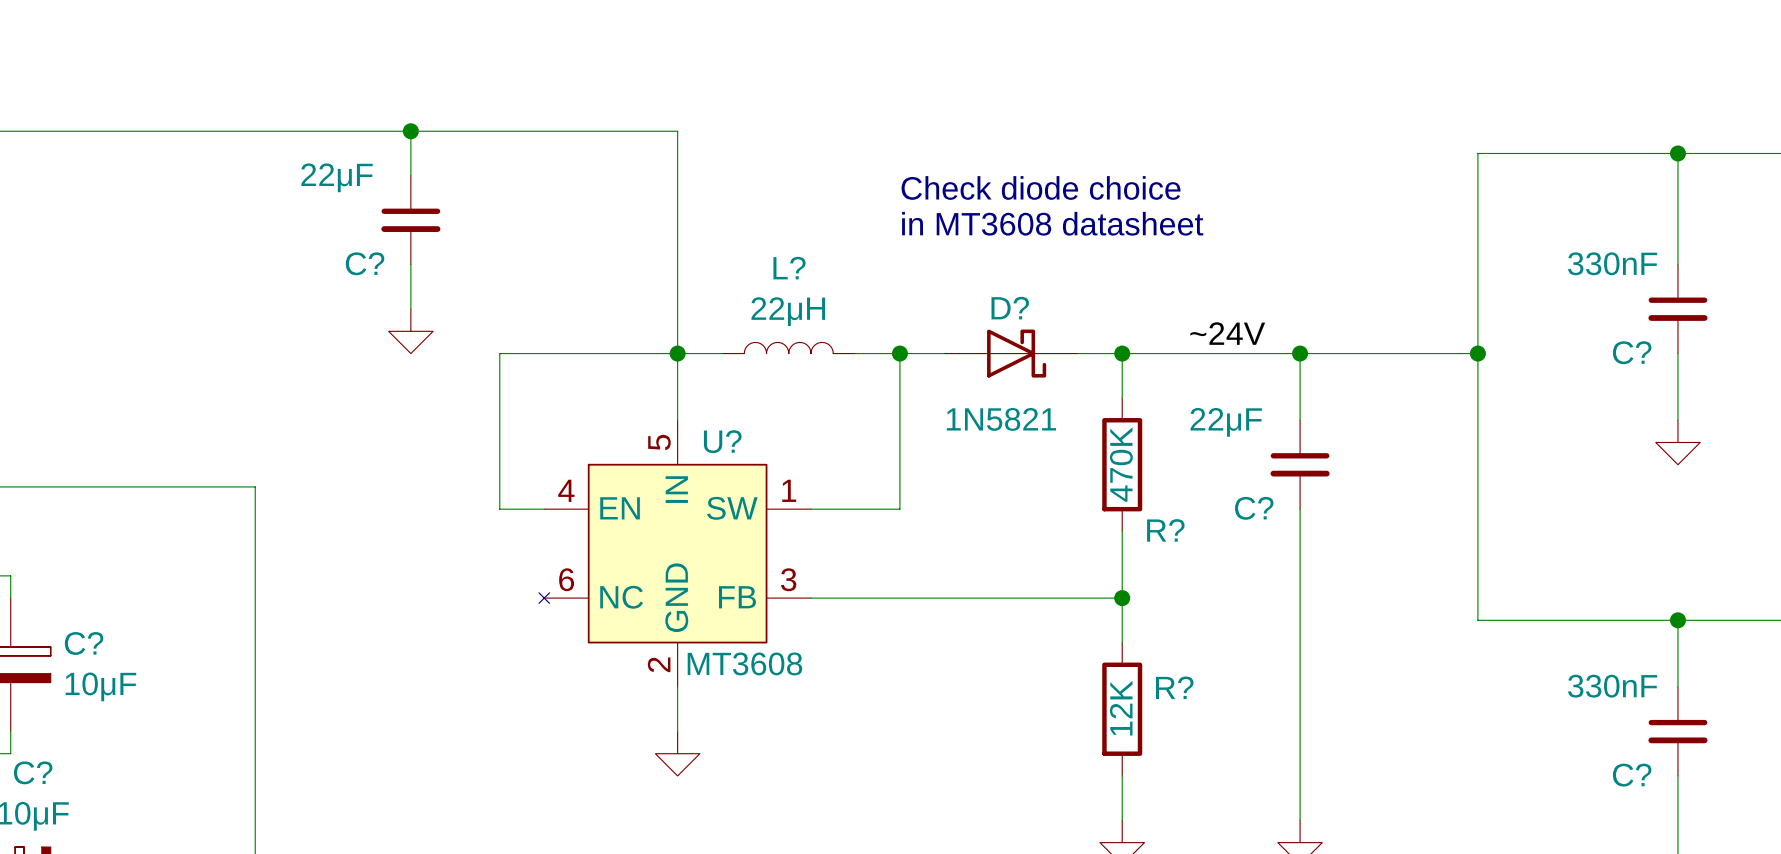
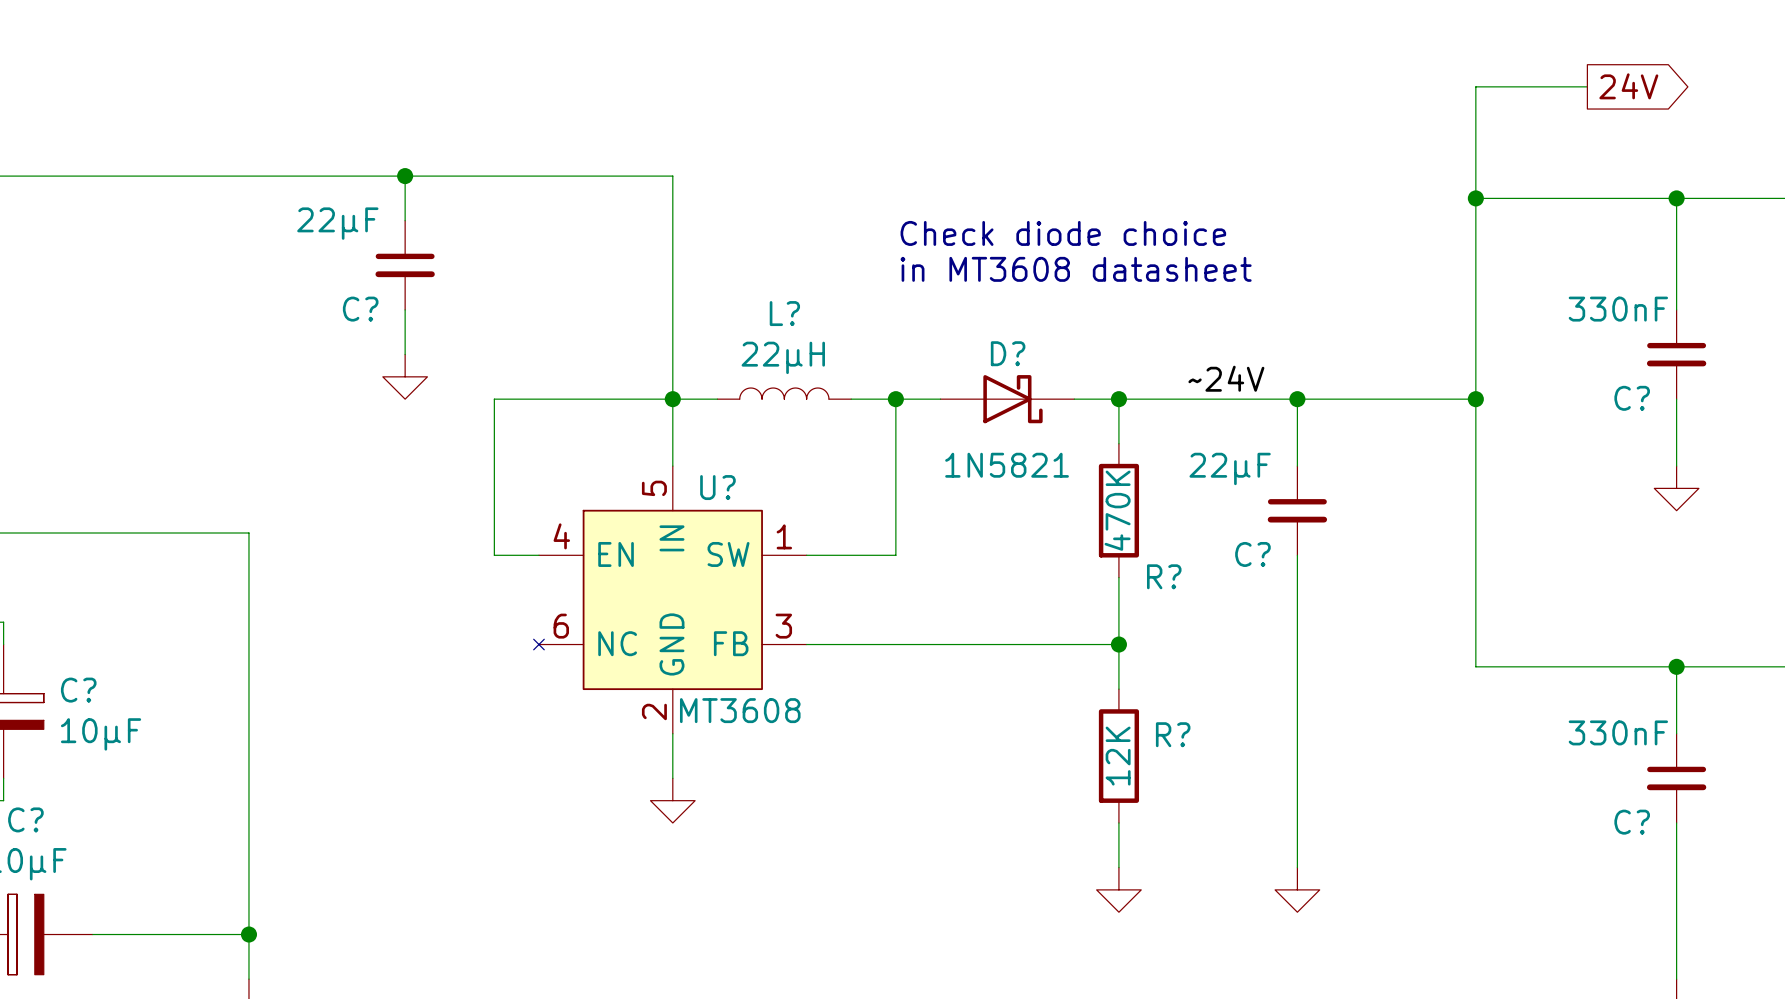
wire: none -> (1587, 86) (1475, 86) (1475, 198)
global label: none -> 24V (1628, 86)
junction: none -> (1475, 198)

